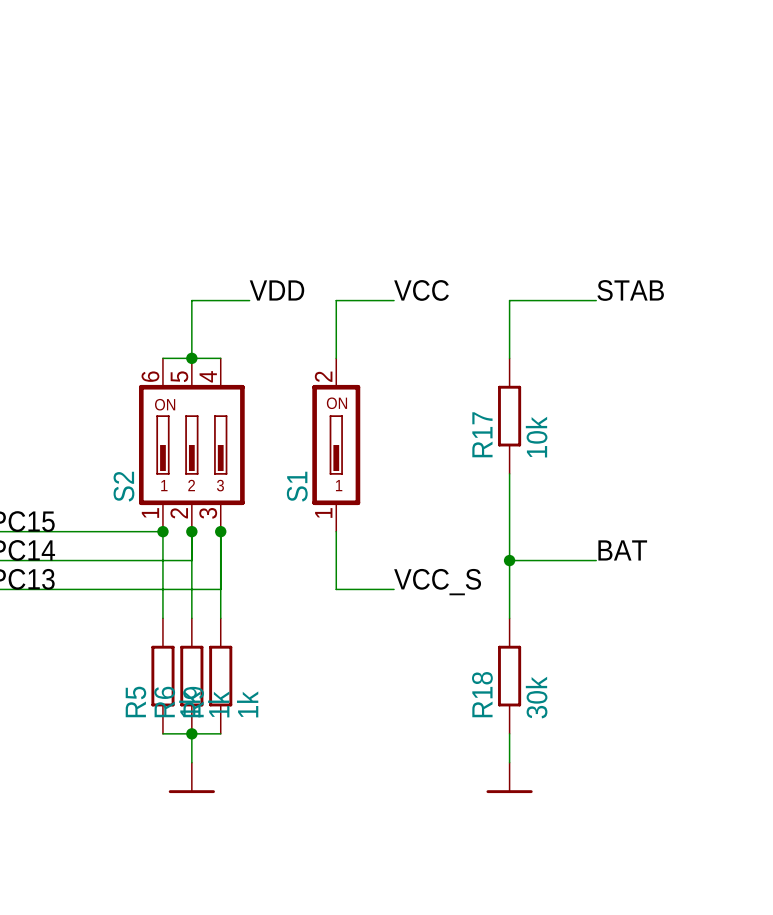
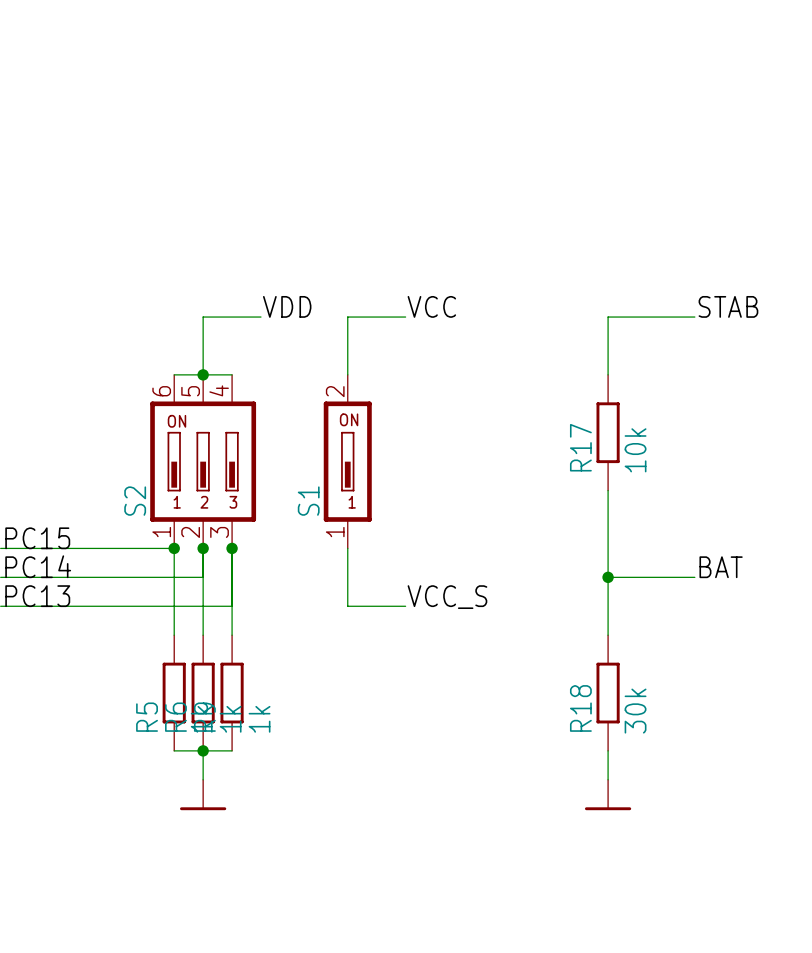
label position: STAB (630, 290) -> STAB (728, 306)
wire: (596, 300) (509, 300) (509, 358) -> (694, 317) (608, 317) (608, 374)
R17 position: (509, 416) -> (608, 432)
wire: (509, 473) (509, 618) -> (608, 490) (608, 635)
label position: BAT (622, 550) -> BAT (721, 567)
wire: (509, 560) (596, 560) -> (694, 577) (608, 577)
junction: (509, 560) -> none
junction: none -> (608, 577)
R18 position: (509, 676) -> (608, 693)
wire: (509, 733) (509, 762) -> (608, 750) (608, 779)
power symbol position: (509, 777) -> (608, 795)

